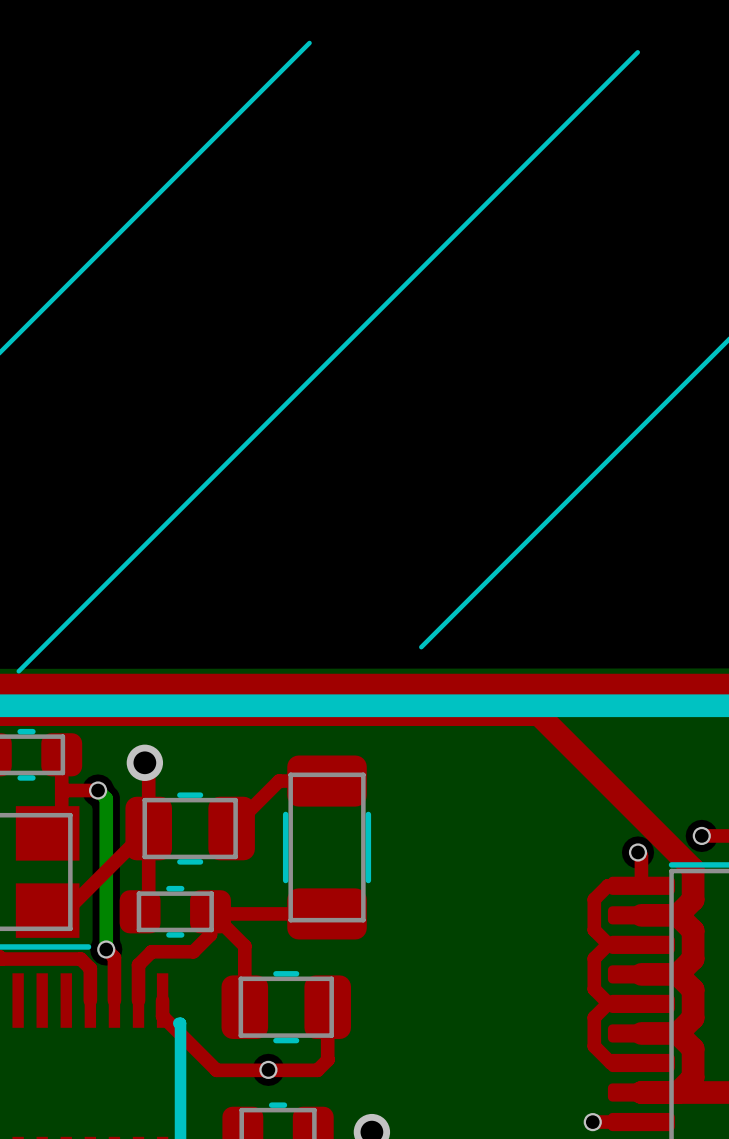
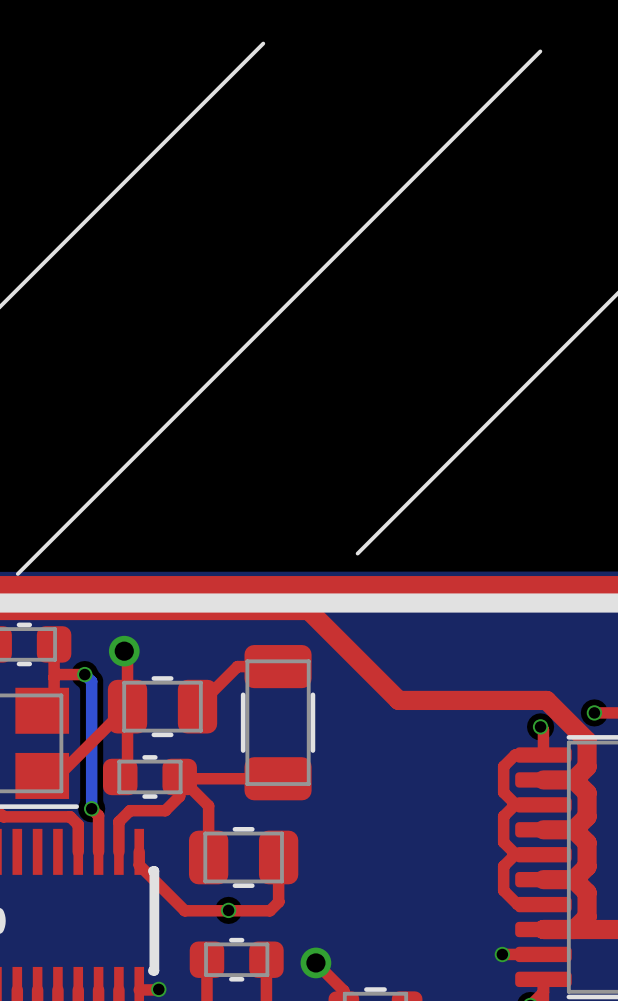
top track: (363, 714) (538, 714) (645, 821) -> (308, 610) (398, 700) (546, 700)

